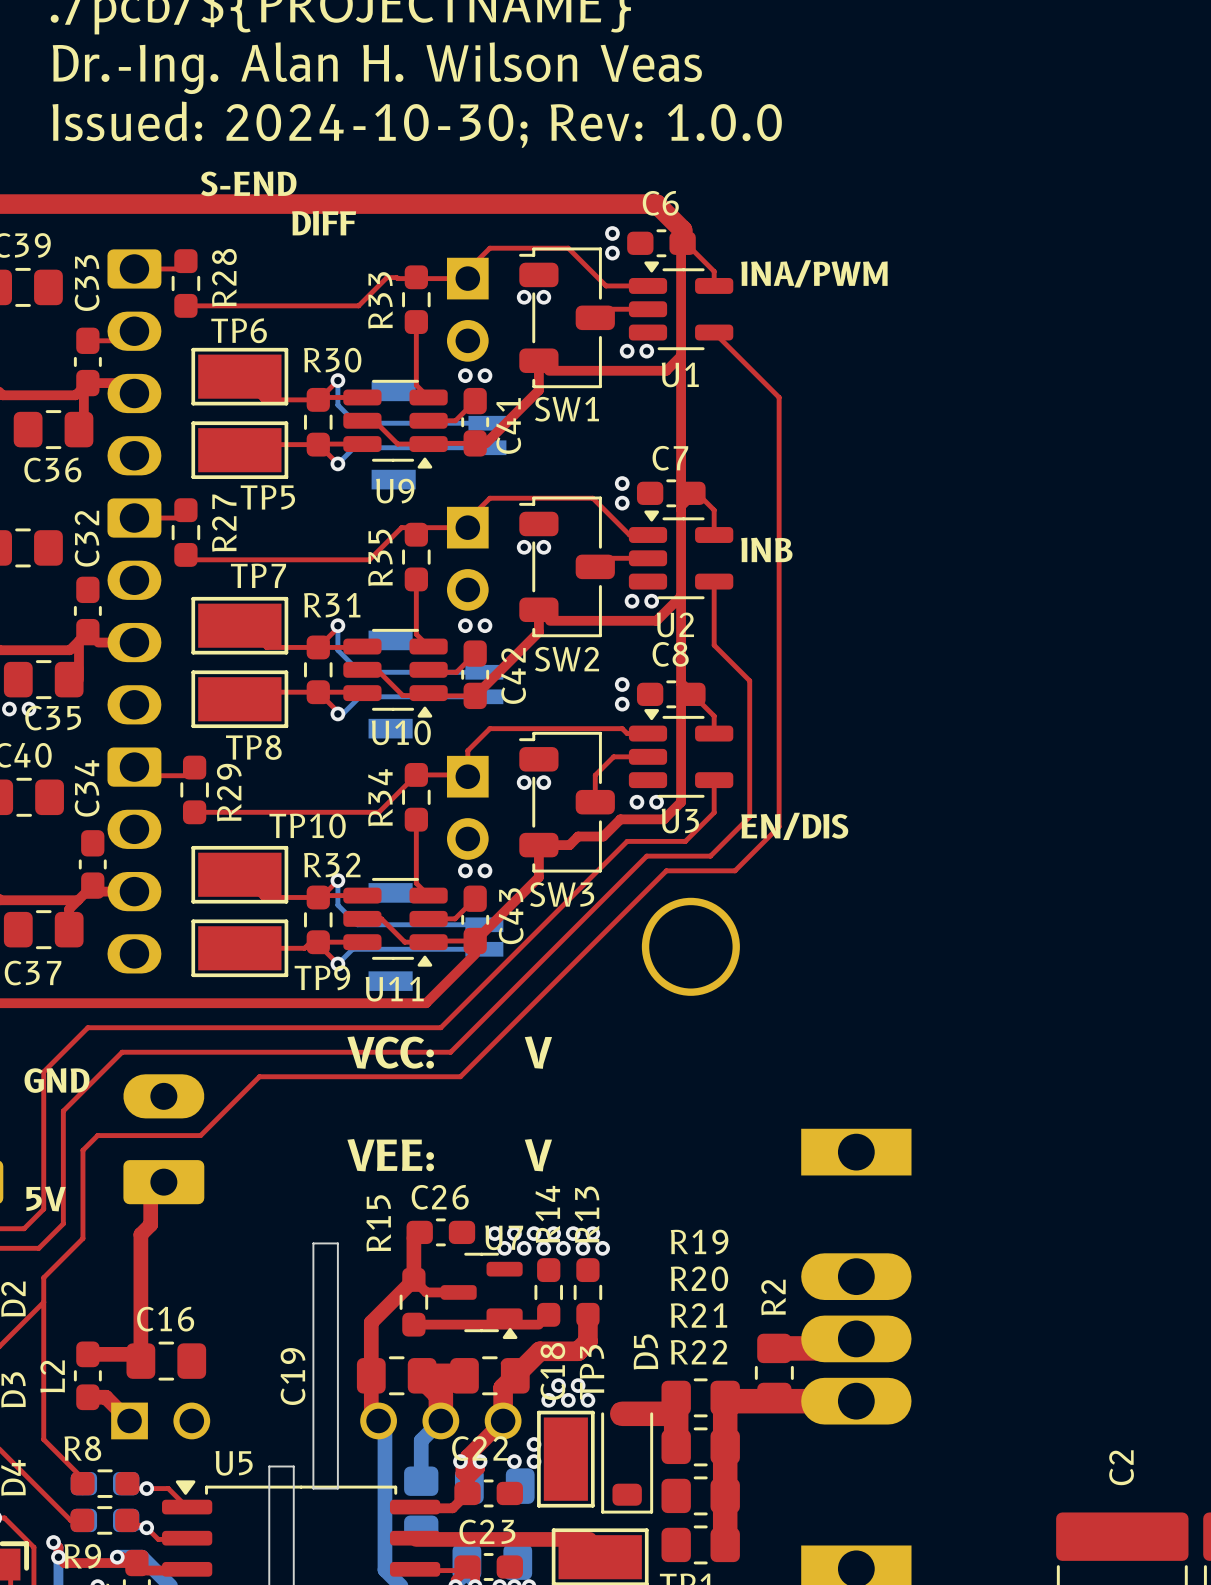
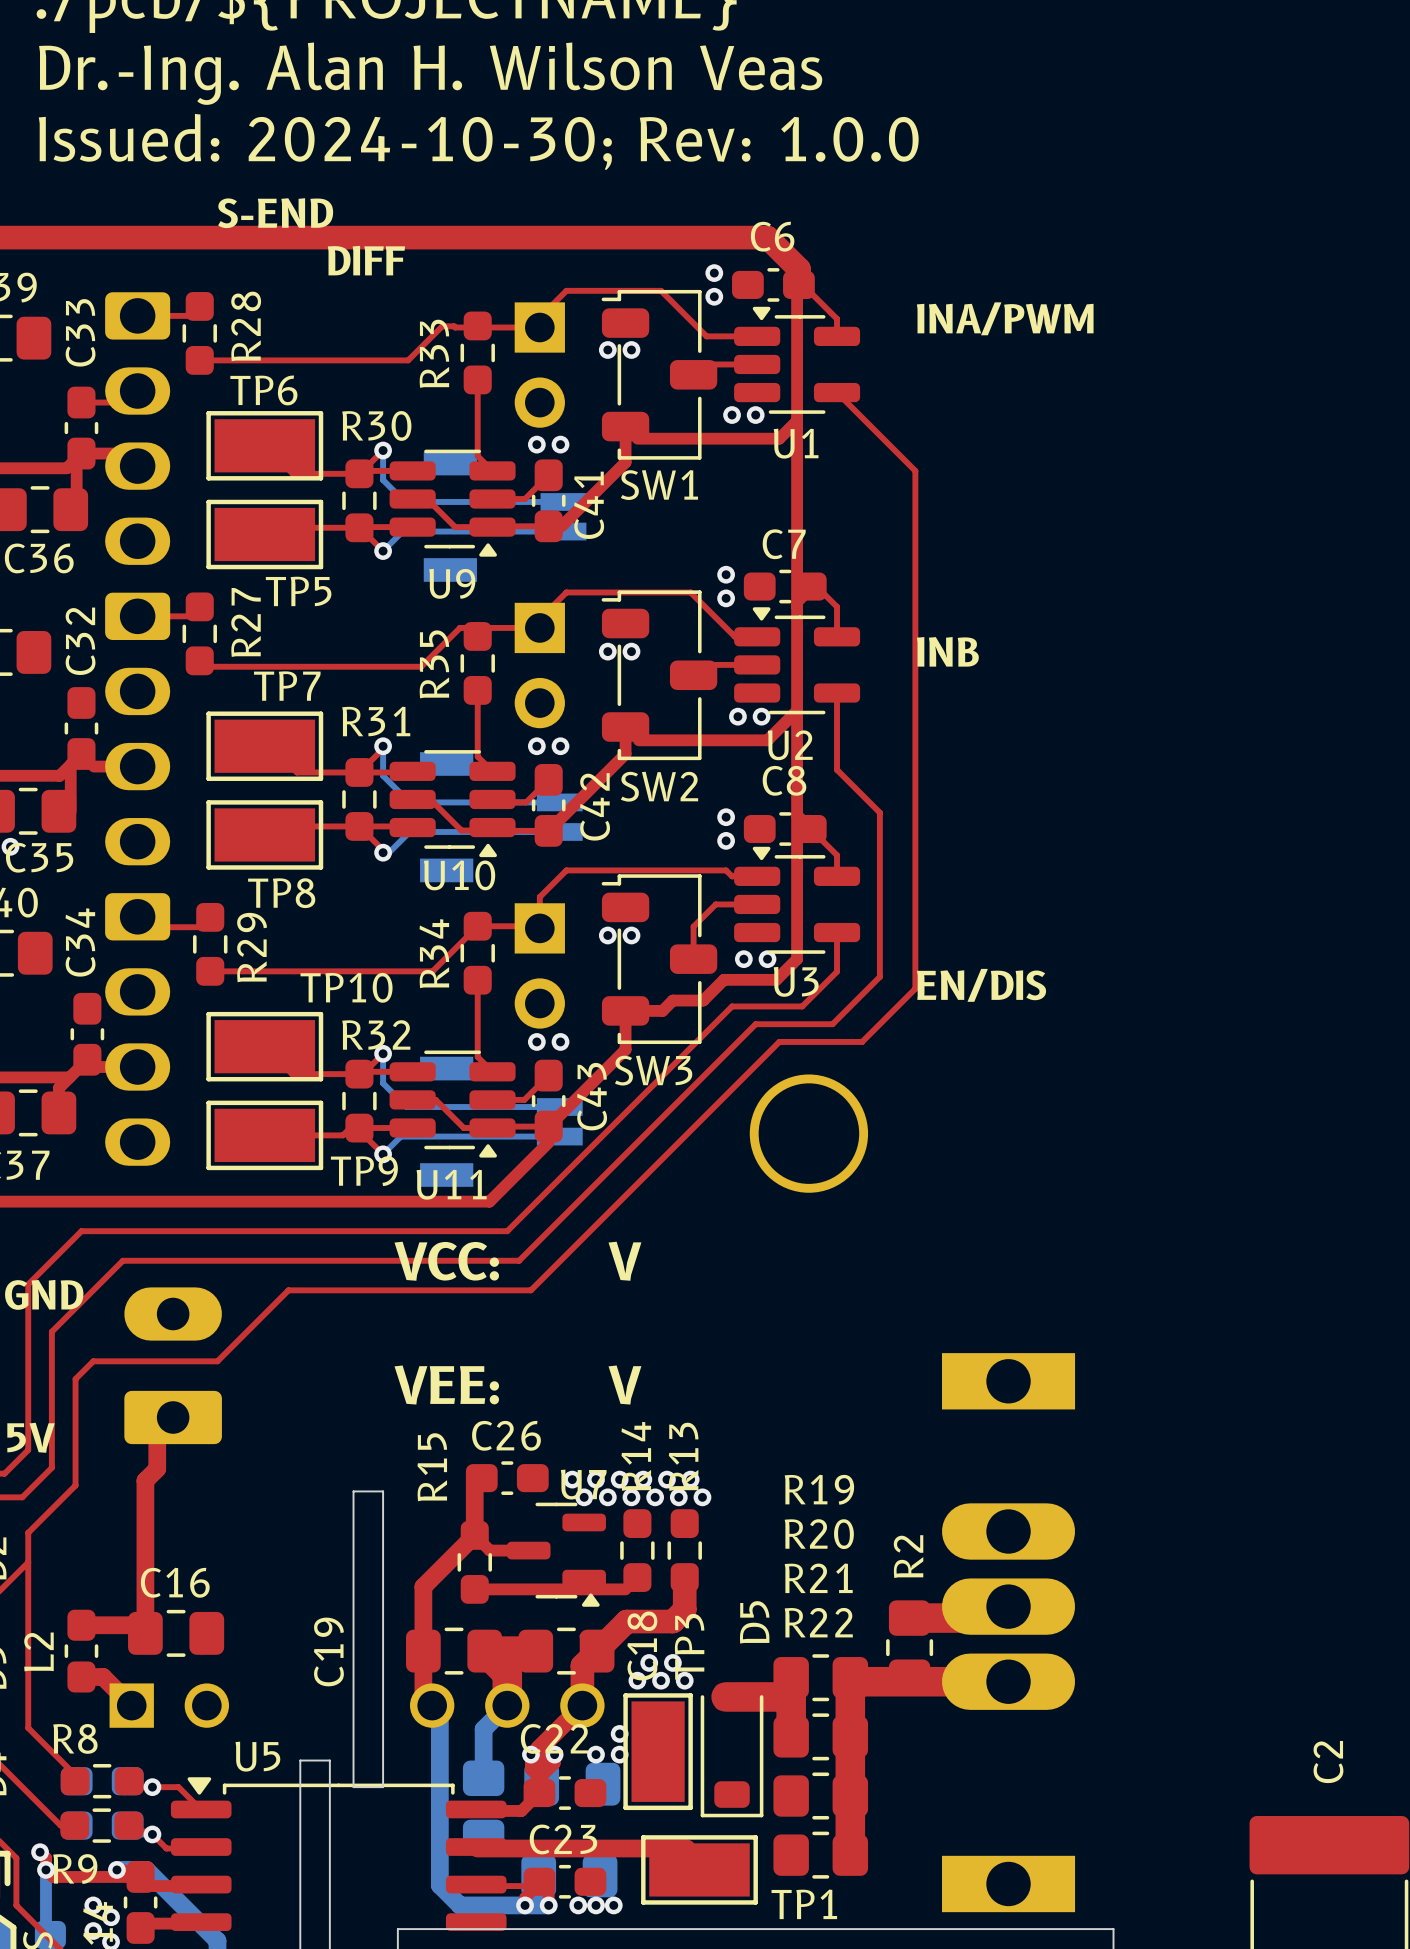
text position: INA/PWM (814, 273) -> INA/PWM (1005, 318)
text position: INB (766, 549) -> INB (947, 651)
text position: EN/DIS (794, 826) -> EN/DIS (981, 985)

